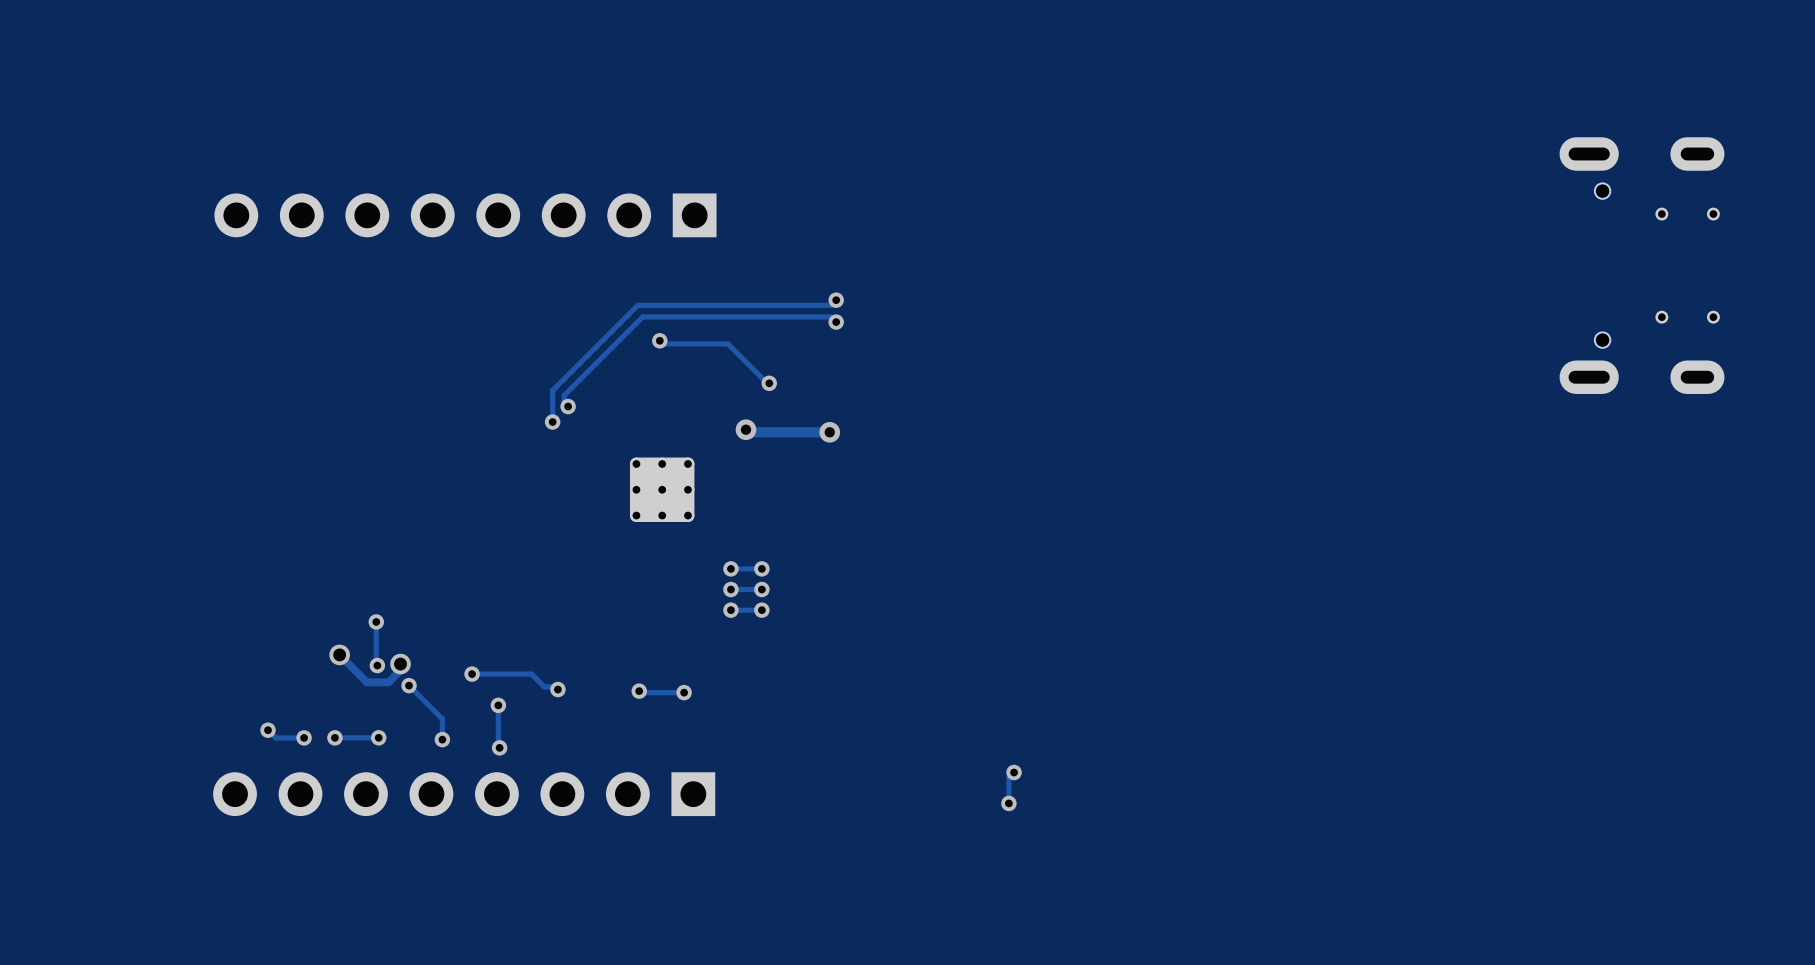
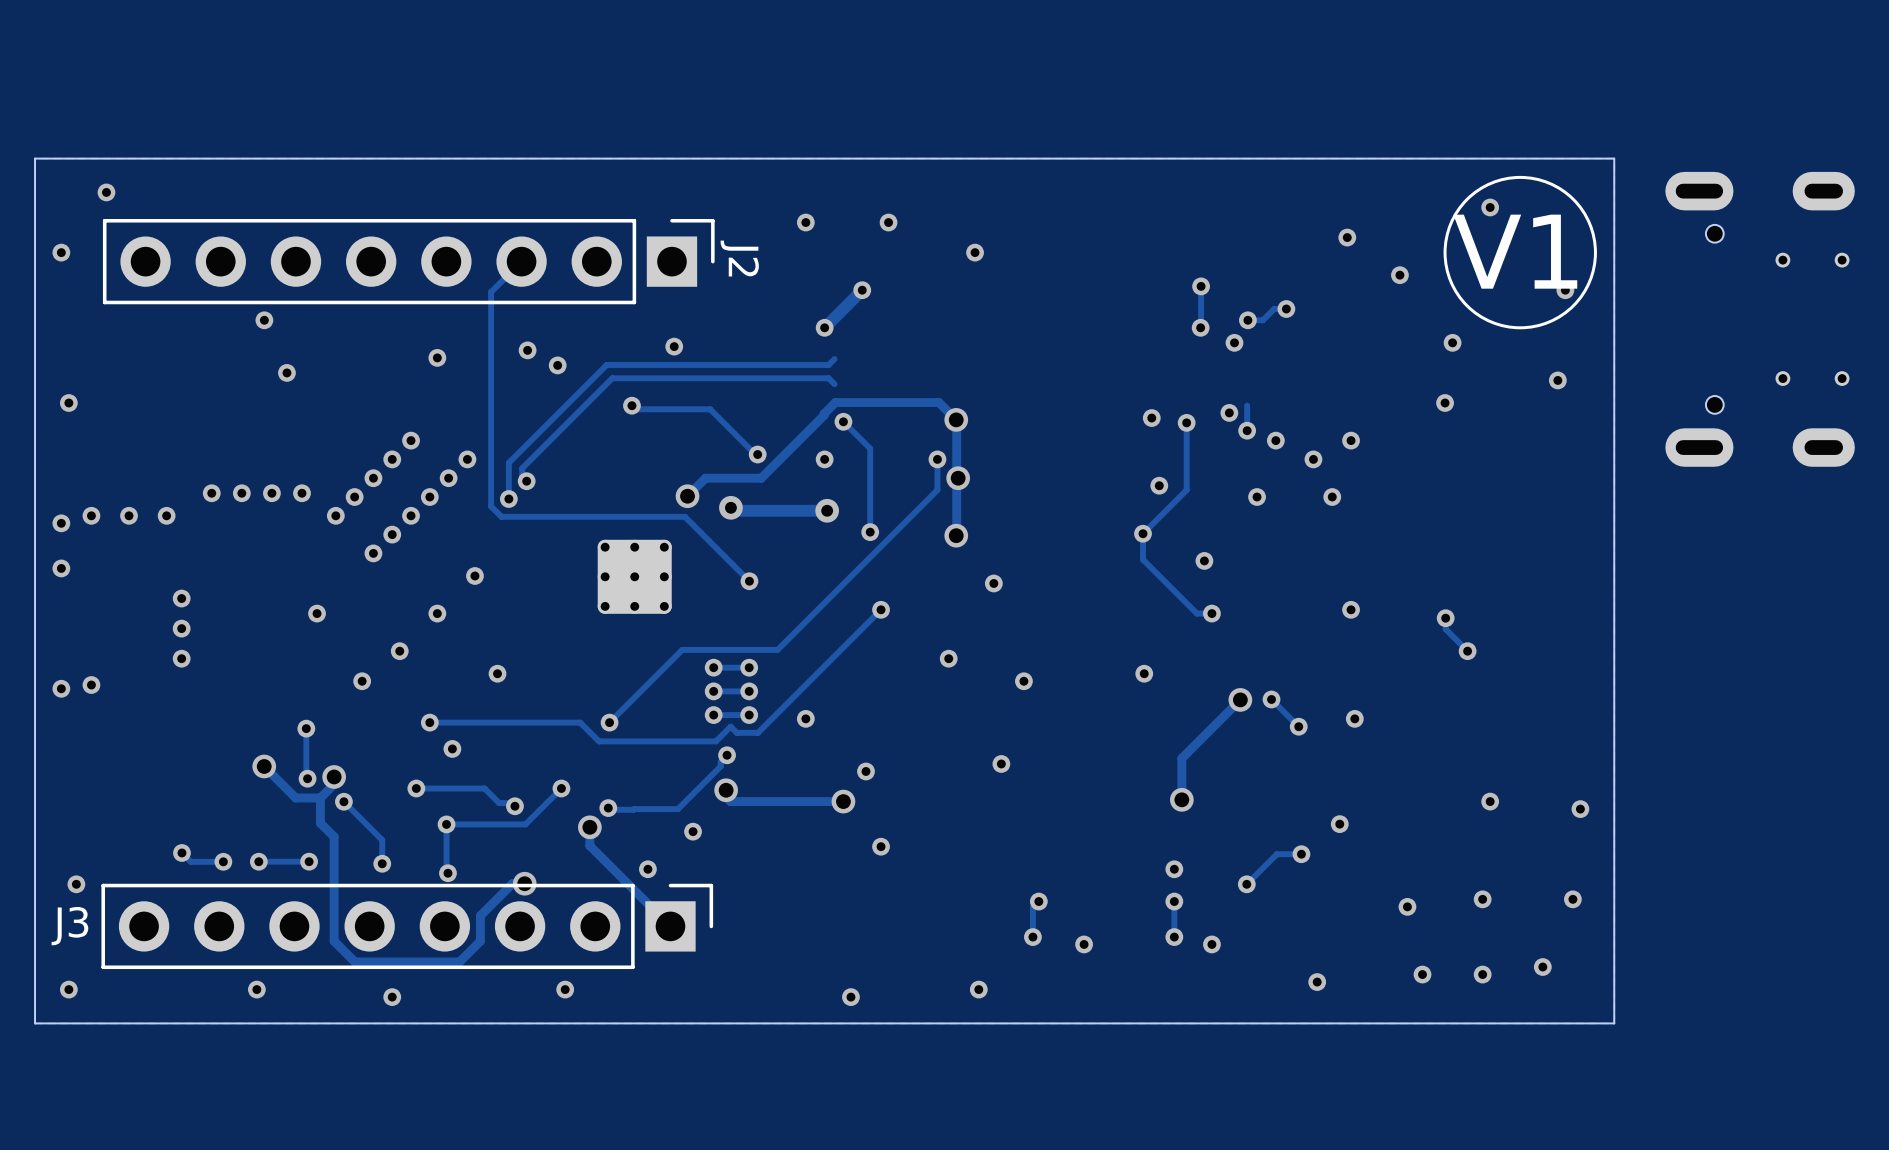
board edge: none -> (1614, 158) (35, 158) (35, 1023) (1614, 1023) (1614, 158)
drawing: none -> [1443, 175, 1597, 330]
via: none -> (106, 192)
via: none -> (1490, 207)
via: none -> (805, 222)
via: none -> (888, 222)
via: none -> (1347, 237)
text: none -> V1 (1515, 251)
via: none -> (61, 252)
via: none -> (975, 252)
J2 side: top (465, 215) -> bottom (408, 261)
track: none -> (521, 261) (491, 292) (491, 506) (501, 516) (685, 516) (749, 581)
via: none -> (1399, 275)
track: none -> (1201, 286) (1200, 327)
via: none -> (1201, 286)
track: none -> (862, 290) (824, 327)
via: none -> (862, 290)
via: none -> (1565, 290)
track: none -> (1286, 309) (1274, 309) (1262, 320) (1247, 320)
via: none -> (1286, 309)
via: none -> (264, 320)
via: none -> (1247, 320)
via: none -> (824, 327)
via: none -> (1200, 327)
via: none -> (1234, 342)
via: none -> (1452, 342)
via: none -> (674, 346)
via: none -> (527, 350)
via: none -> (437, 357)
via: (836, 300) -> none
via: none -> (557, 365)
via: none -> (286, 372)
via: none -> (1557, 380)
via: (836, 322) -> none
via: none -> (68, 403)
via: none -> (1445, 403)
track: none -> (1247, 405) (1247, 430)
via: none -> (1229, 412)
via: none -> (1151, 418)
via: none -> (956, 419)
track: none -> (843, 421) (870, 448) (870, 532)
via: none -> (843, 421)
track: none -> (1186, 422) (1186, 490) (1143, 533) (1143, 559) (1196, 613) (1211, 613)
via: none -> (1186, 422)
via: none -> (1247, 430)
via: none -> (411, 440)
via: none -> (1275, 440)
via: none -> (1351, 440)
via: none -> (392, 459)
via: none -> (467, 459)
via: none -> (824, 459)
track: none -> (937, 459) (937, 490) (777, 649) (682, 649) (609, 722)
via: none -> (937, 459)
via: none -> (1313, 459)
via: none -> (373, 478)
via: none -> (448, 478)
via: none -> (958, 478)
via: none -> (1159, 485)
via: none -> (211, 493)
via: none -> (241, 493)
via: none -> (271, 493)
via: none -> (301, 493)
track: none -> (687, 496) (705, 478) (761, 478) (835, 402) (938, 402) (956, 420) (956, 535)
via: none -> (687, 496)
via: none -> (354, 497)
via: none -> (429, 497)
via: none -> (1257, 497)
via: none -> (1332, 497)
via: none -> (91, 515)
via: none -> (129, 515)
via: none -> (166, 515)
via: none -> (335, 515)
via: none -> (411, 515)
via: none -> (61, 523)
via: none -> (870, 532)
via: none -> (1143, 533)
via: none -> (392, 534)
via: none -> (956, 535)
via: none -> (373, 553)
via: none -> (1204, 560)
via: none -> (61, 568)
via: none -> (474, 575)
via: none -> (749, 581)
via: none -> (993, 583)
via: none -> (181, 598)
track: none -> (881, 609) (758, 732) (736, 732) (730, 726) (715, 741) (599, 741) (580, 722) (429, 722)
via: none -> (881, 609)
via: none -> (1351, 609)
via: none -> (317, 613)
via: none -> (437, 613)
via: none -> (1211, 613)
track: none -> (1445, 618) (1445, 629) (1467, 651)
via: none -> (1445, 618)
via: none -> (181, 628)
via: none -> (399, 651)
via: none -> (1467, 651)
via: none -> (181, 658)
via: none -> (948, 658)
via: none -> (497, 673)
via: none -> (1144, 673)
via: none -> (362, 681)
via: none -> (1023, 681)
via: none -> (91, 685)
via: none -> (61, 688)
track: none -> (1240, 699) (1181, 758) (1181, 799)
via: none -> (1240, 699)
track: none -> (1271, 699) (1298, 726)
via: none -> (1271, 699)
via: none -> (805, 718)
via: none -> (1354, 718)
via: none -> (429, 722)
via: none -> (609, 722)
via: none -> (1298, 726)
via: none -> (452, 748)
via: none -> (727, 755)
via: none -> (1001, 763)
via: none -> (866, 771)
track: none -> (561, 788) (525, 824) (446, 824)
via: none -> (561, 788)
track: none -> (726, 790) (726, 797) (730, 801) (843, 801)
via: none -> (726, 790)
track: none -> (320, 797) (320, 823) (334, 836) (334, 941) (354, 961) (459, 961) (480, 941) (480, 915) (512, 883) (524, 883)
via: none -> (1181, 799)
via: none -> (843, 801)
via: none -> (1490, 801)
track: (684, 692) (661, 692) -> (727, 755) (720, 761) (720, 766) (678, 809) (633, 809)
via: (684, 692) -> none
via: none -> (1580, 809)
via: none -> (1339, 824)
via: none -> (589, 827)
track: none -> (594, 831) (589, 827) (589, 845) (670, 926)
via: none -> (693, 831)
via: none -> (881, 846)
track: none -> (1301, 854) (1276, 854) (1246, 884)
via: none -> (1301, 854)
via: none -> (647, 869)
via: none -> (1174, 869)
via: none -> (76, 884)
via: none -> (524, 883)
via: none -> (1246, 884)
via: none -> (1482, 899)
via: none -> (1572, 899)
track: none -> (1174, 901) (1174, 937)
via: none -> (1174, 901)
via: none -> (1407, 906)
J3 side: top (464, 794) -> bottom (407, 926)
via: none -> (1174, 937)
via: none -> (1084, 944)
via: none -> (1211, 944)
via: none -> (1542, 967)
via: none -> (1422, 974)
via: none -> (1482, 974)
via: none -> (1317, 982)
via: none -> (68, 989)
via: none -> (256, 989)
via: none -> (565, 989)
via: none -> (978, 989)
via: none -> (392, 997)
via: none -> (850, 997)

